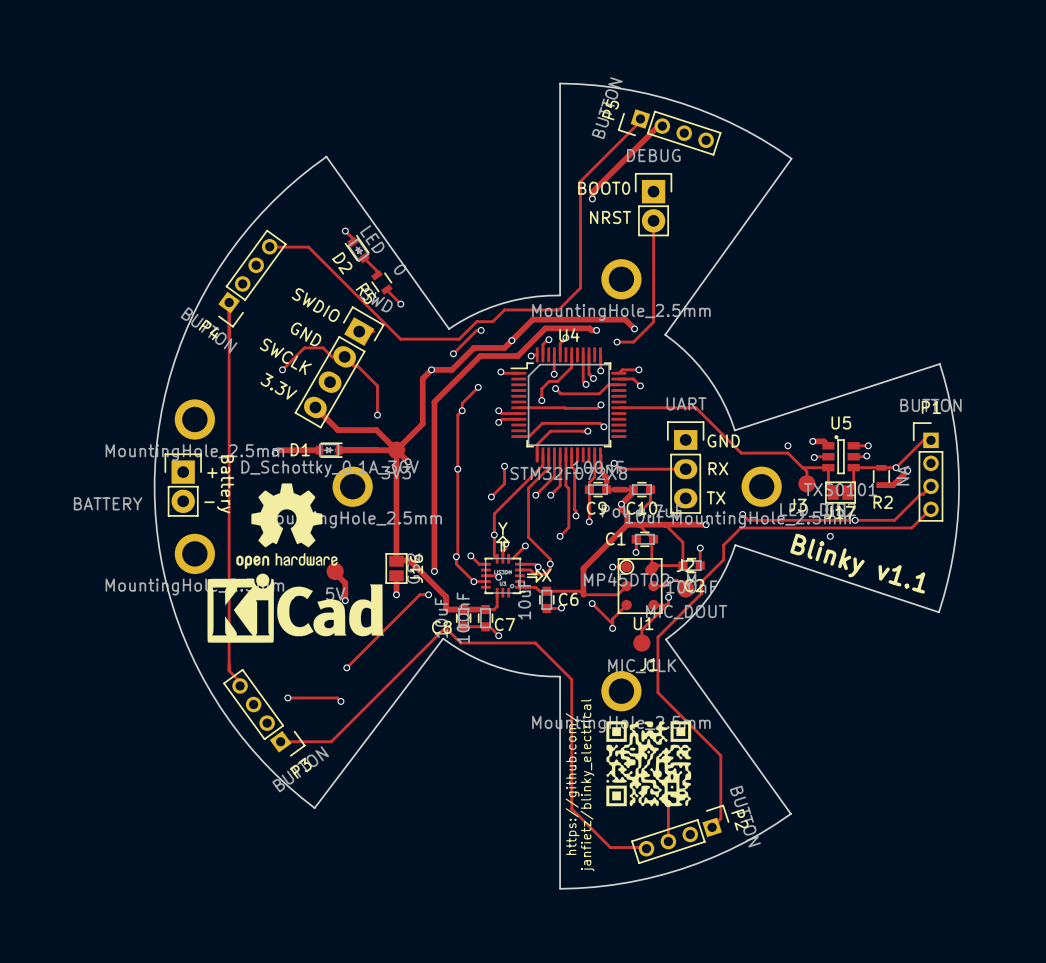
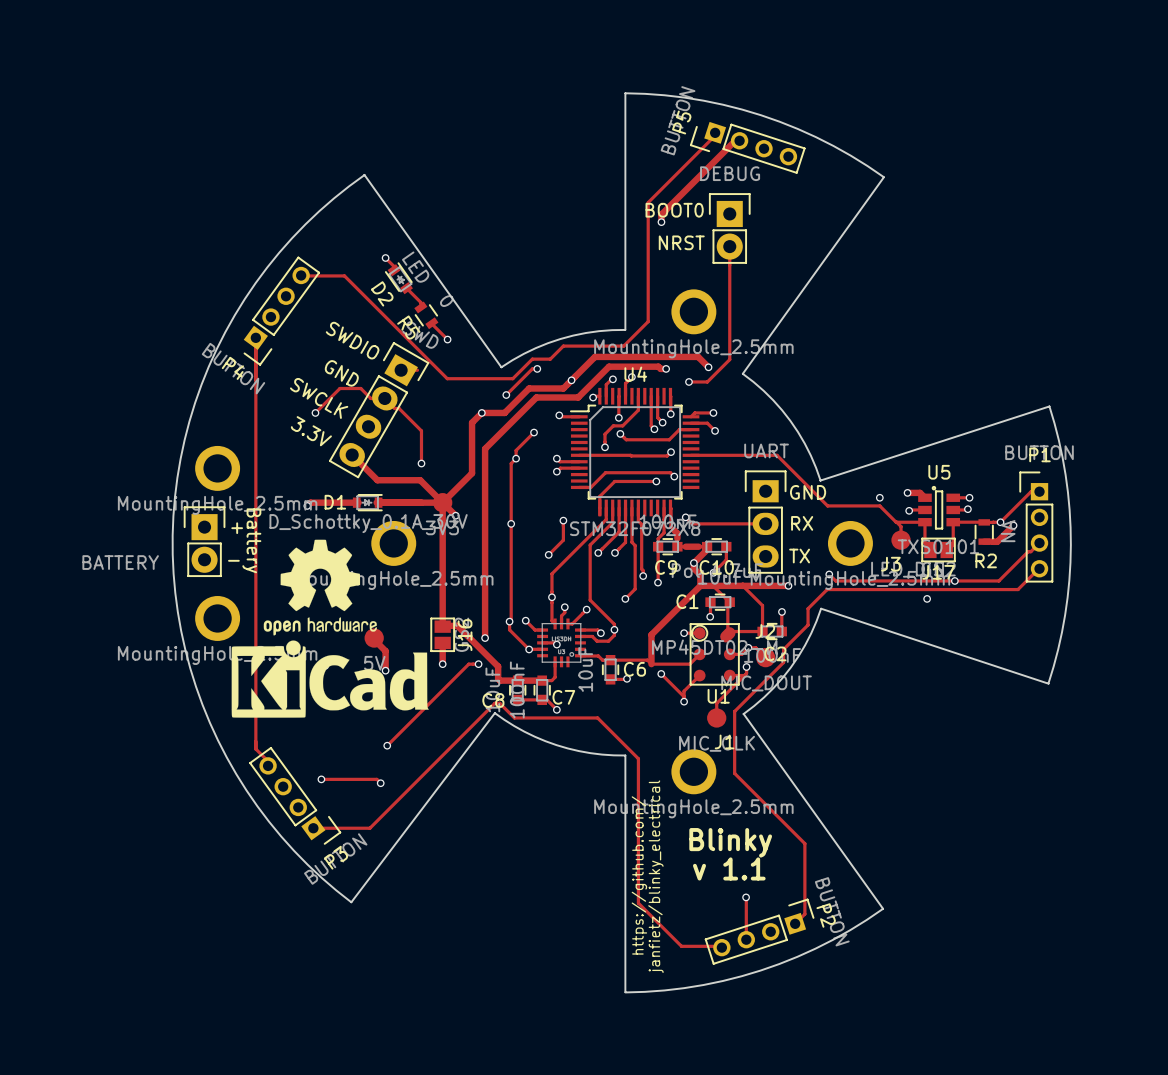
part footprint: [481, 535, 544, 598] -> [537, 618, 586, 668]
text: Blinky v1.1 (857, 563) -> none
drawing: [606, 721, 692, 807] -> none
text: none -> Blinky (730, 842)
text: none -> v 1.1 (729, 868)

